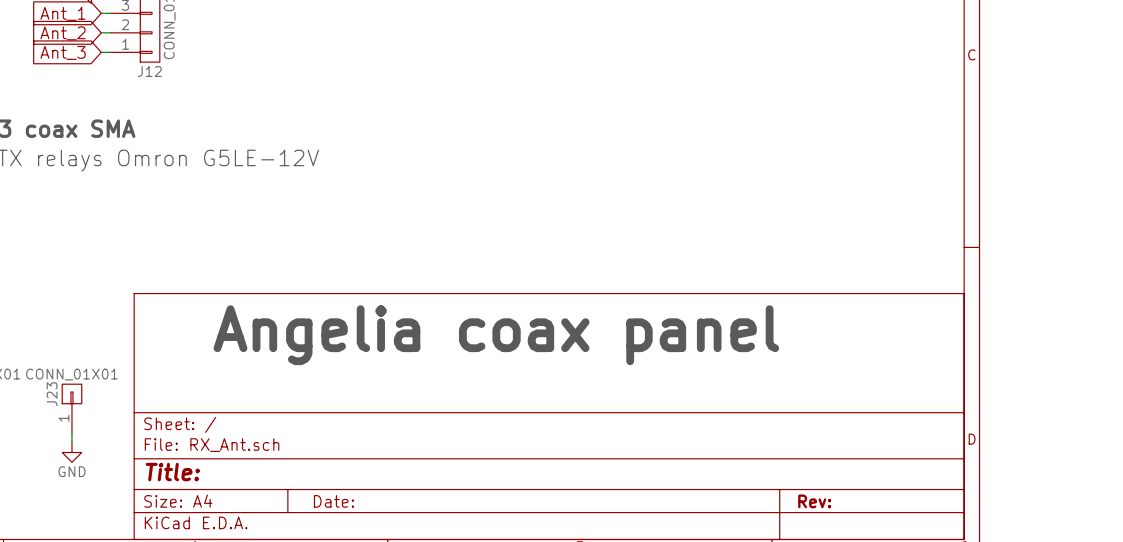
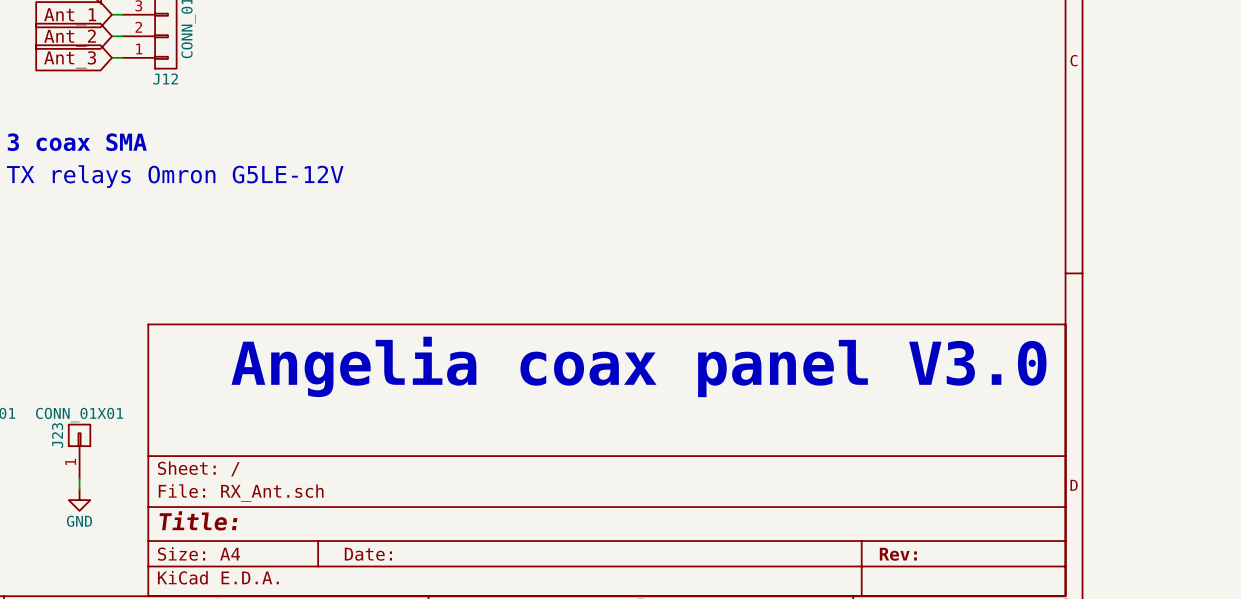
text: Angelia coax panel (496, 335) -> Angelia coax panel V3.0 (639, 366)

